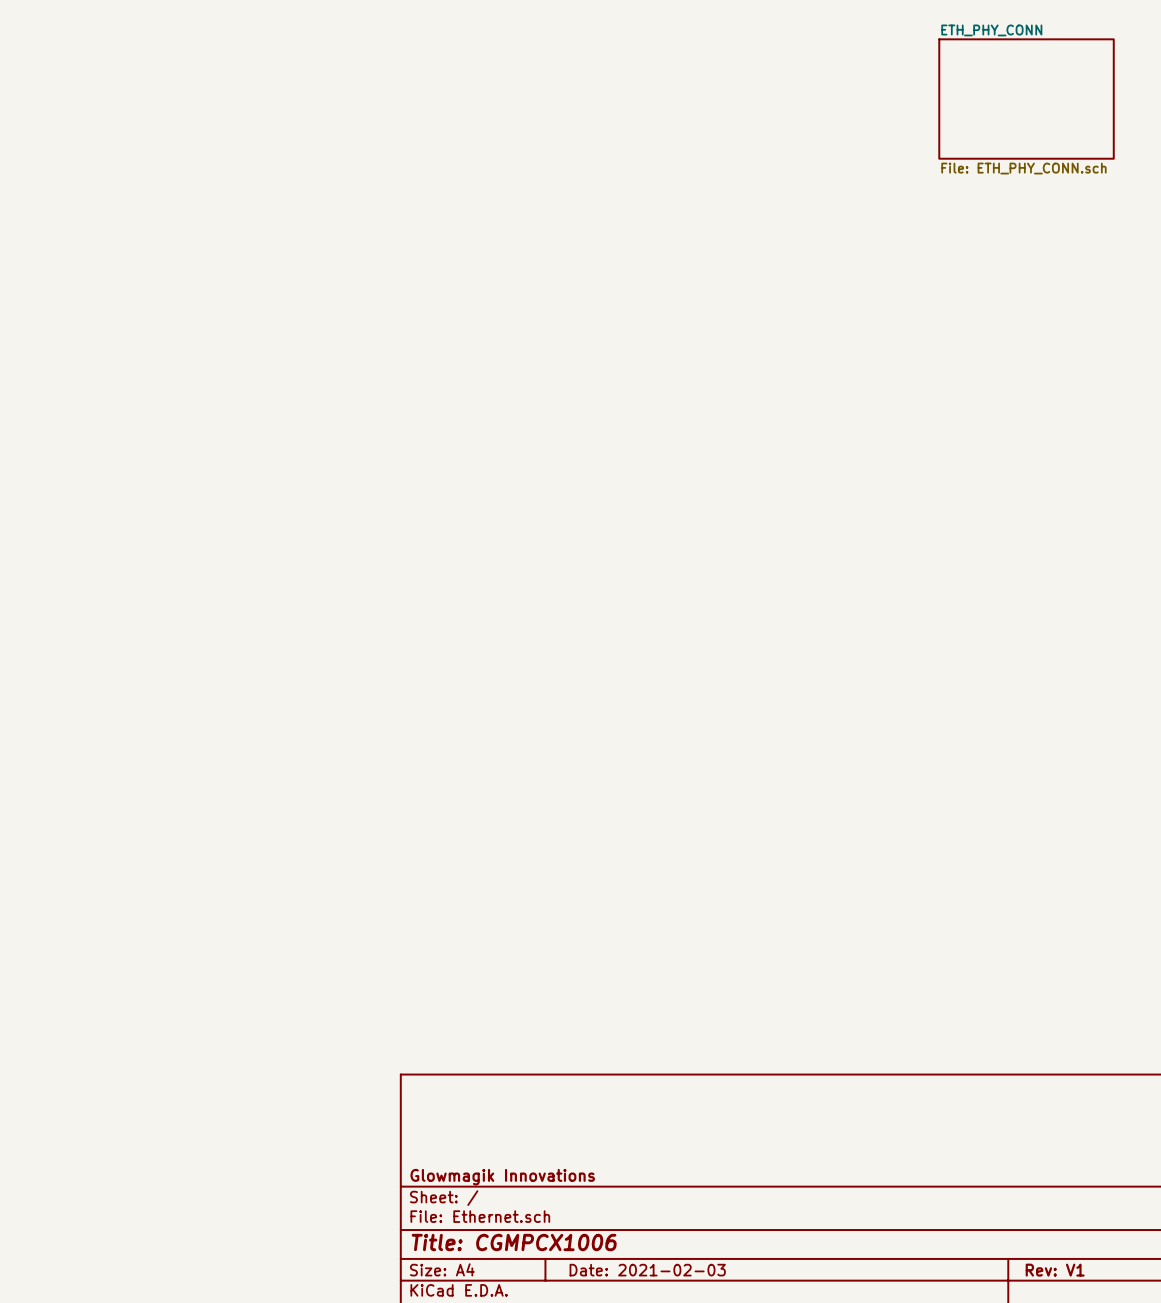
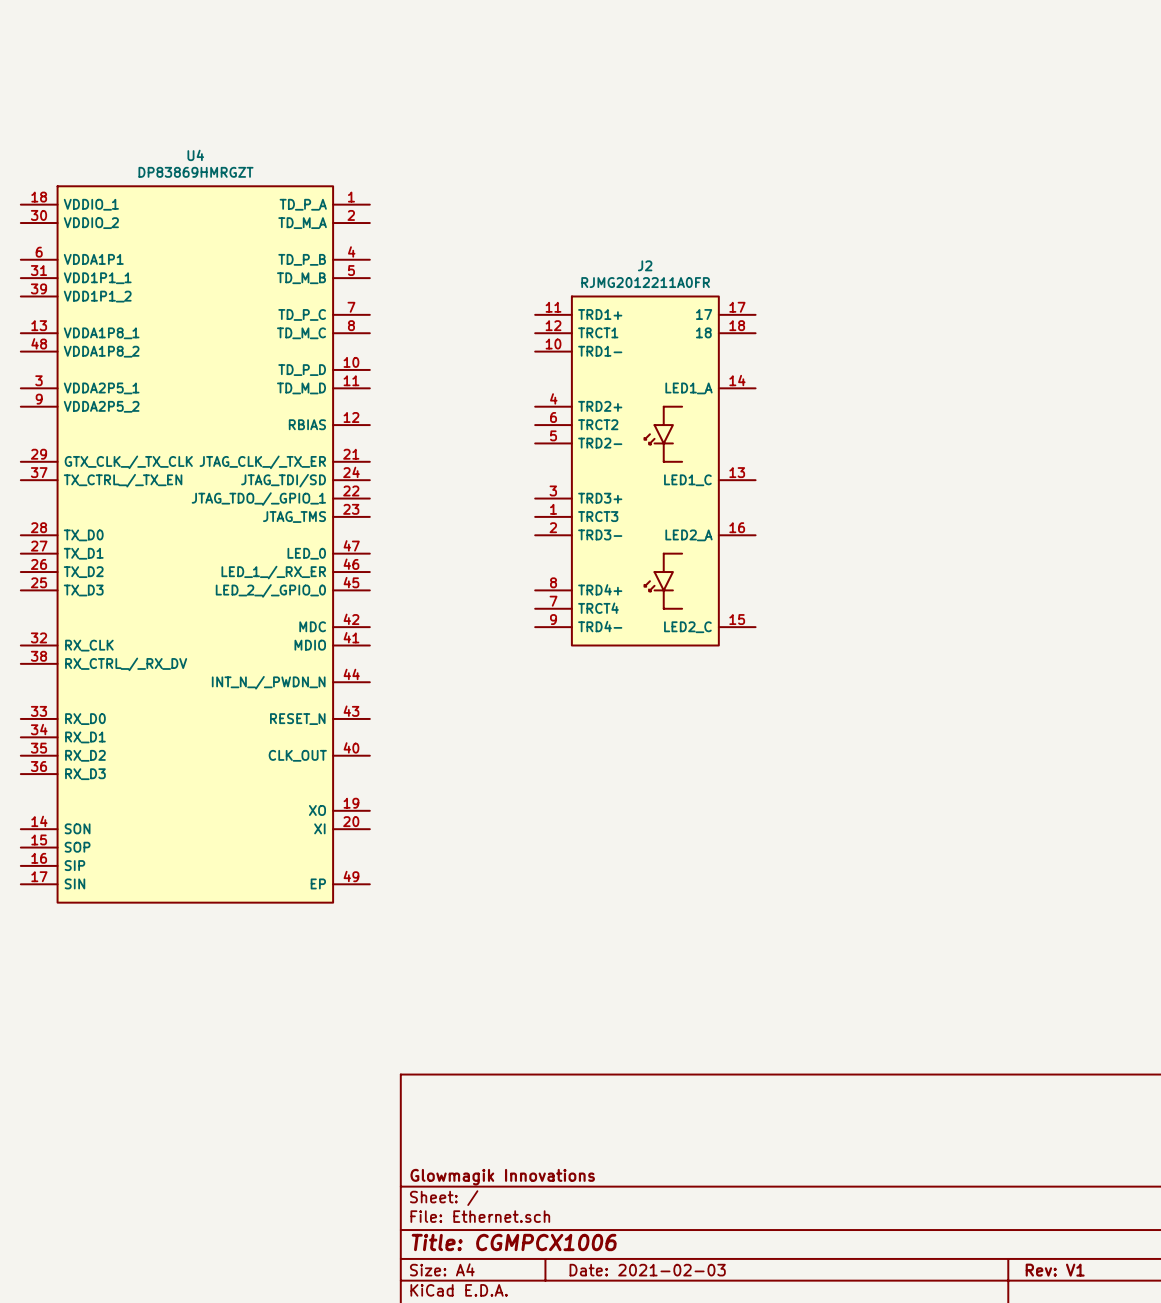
sheet ETH_PHY_CONN: File: ETH_PHY_CONN.sch (1026, 99) -> none
J2: none -> RJMG2012211A0FR (645, 470)
U4: none -> DP83869HMRGZT (195, 544)

